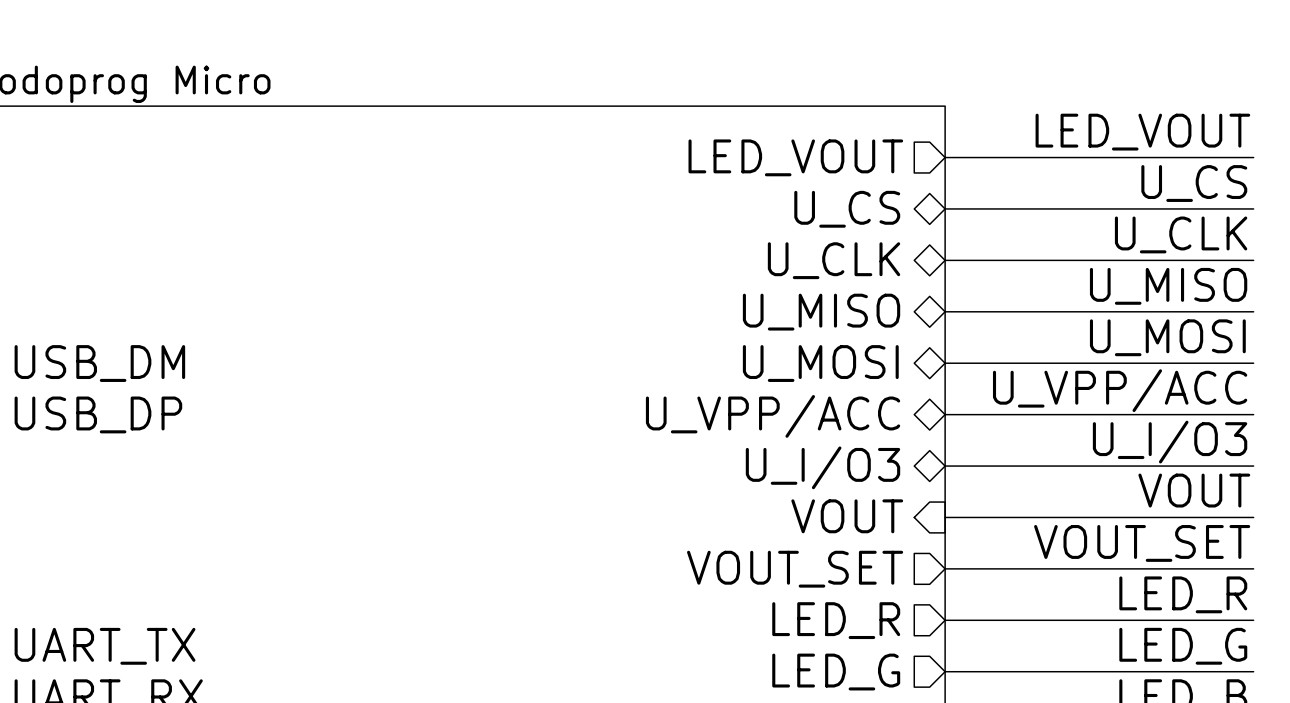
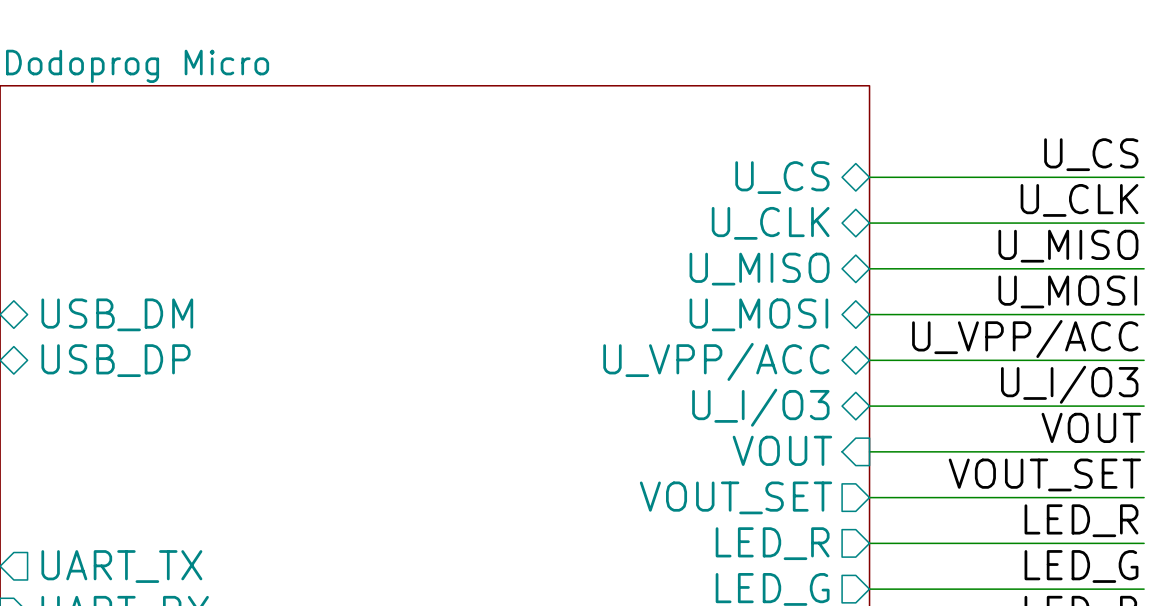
label: LED_VOUT (1142, 132) -> none
sheet pin: LED_VOUT (795, 157) -> none
wire: (945, 157) (1253, 157) -> none

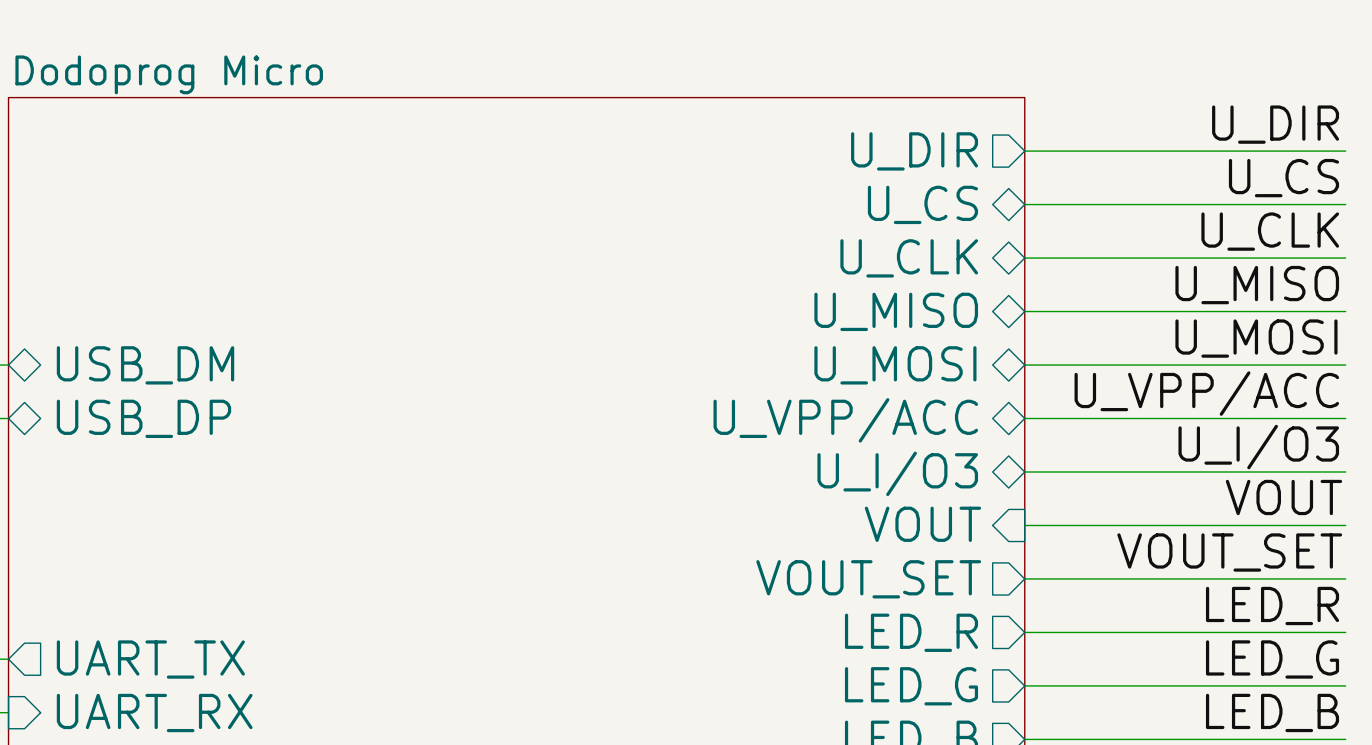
label: none -> U_DIR (1275, 124)
sheet pin: none -> U_DIR (914, 151)
wire: none -> (1024, 151) (1345, 151)

